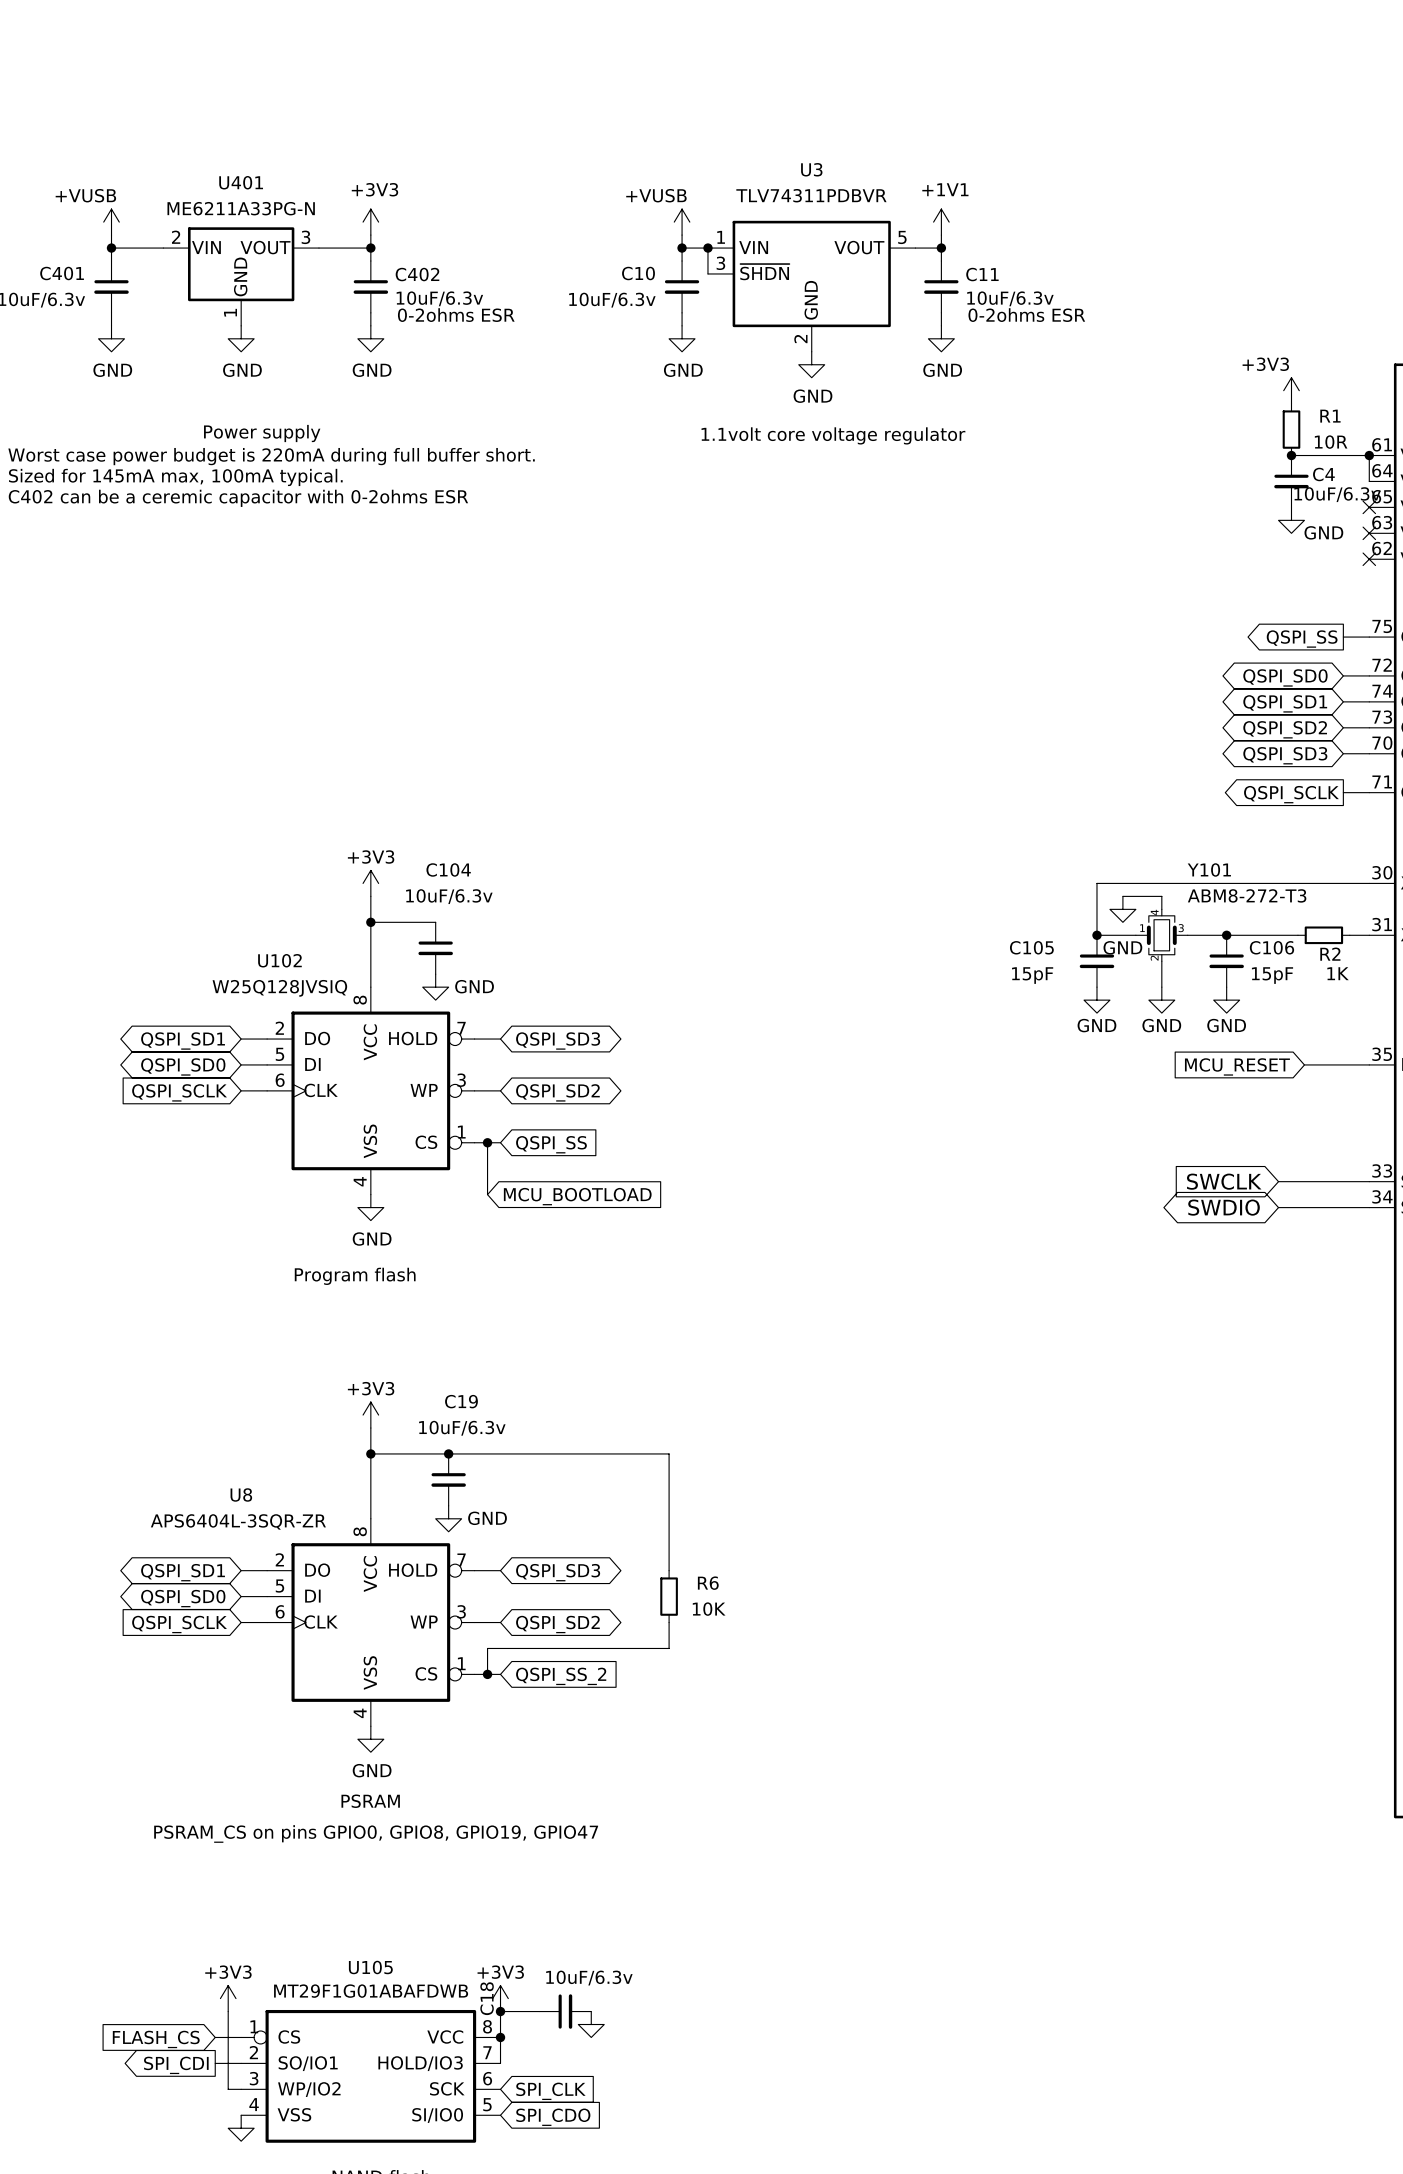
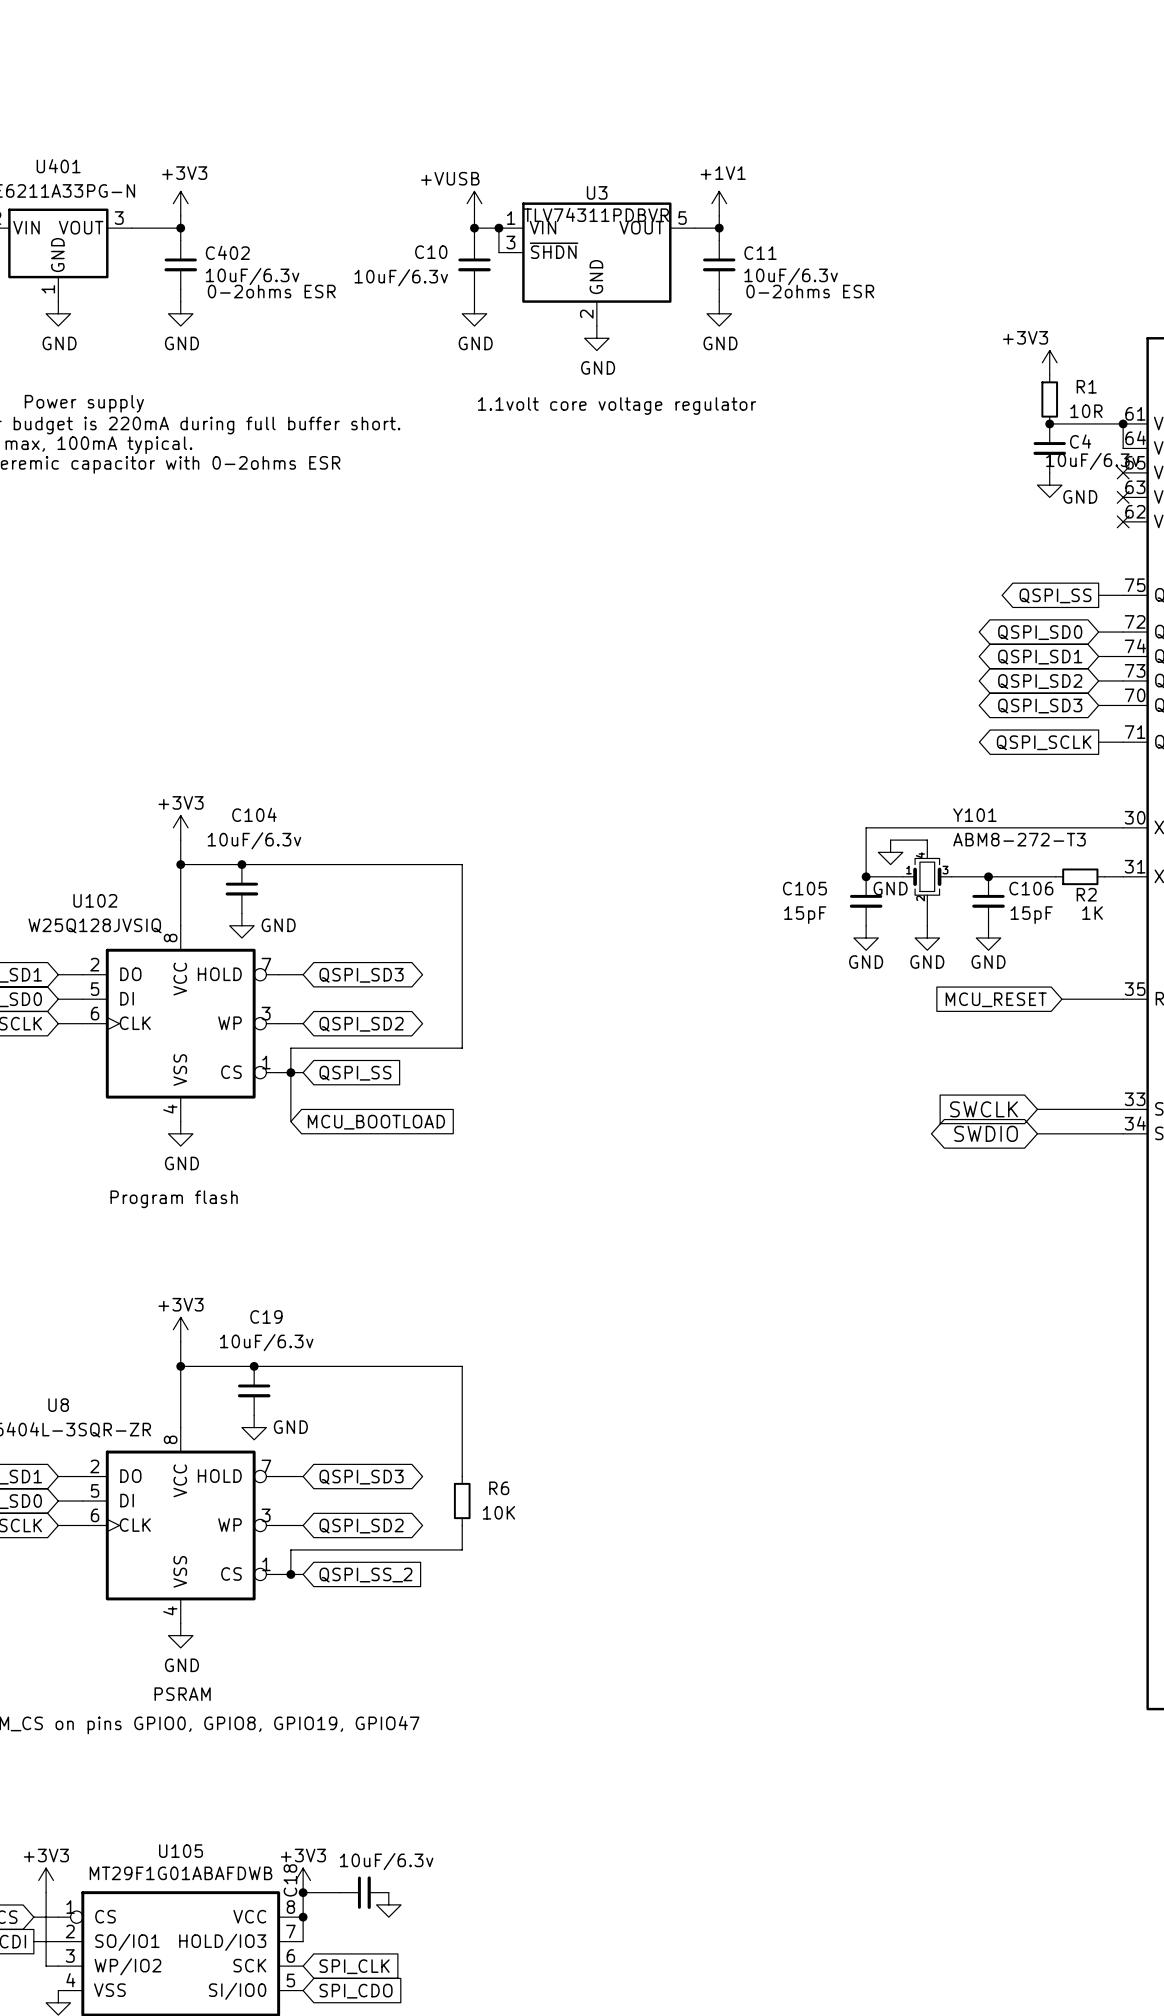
U3 name position: U3 (811, 169) -> U3 (597, 192)
U3 value position: TLV74311PDBVR (811, 195) -> TLV74311PDBVR (596, 214)
wire: none -> (241, 864) (462, 864) (462, 1048) (290, 1048) (290, 1072)
junction: none -> (241, 864)

